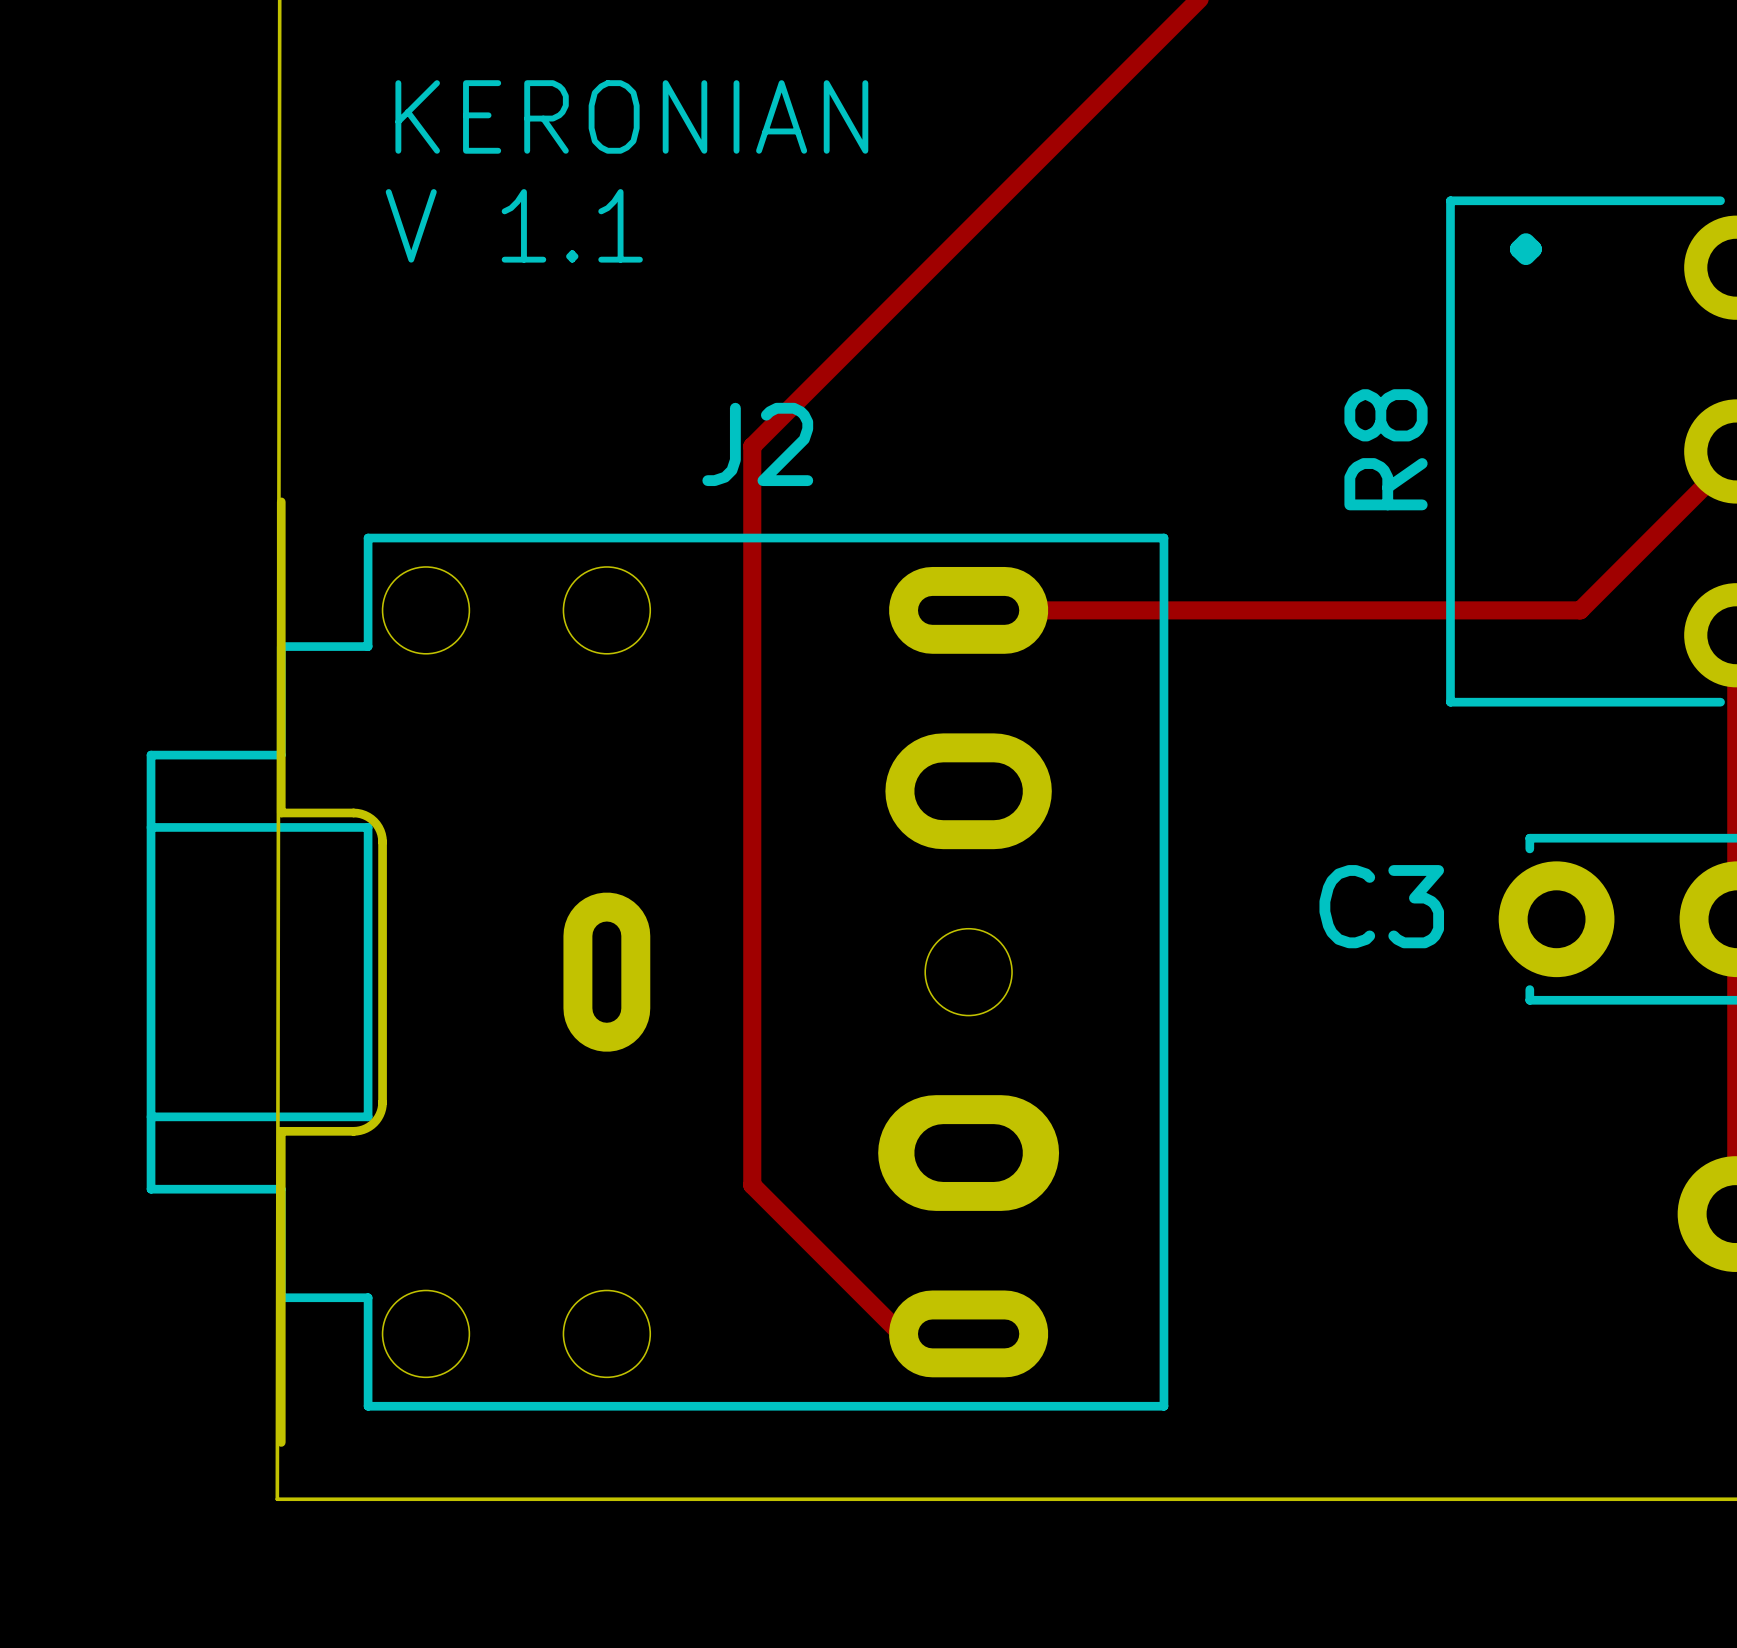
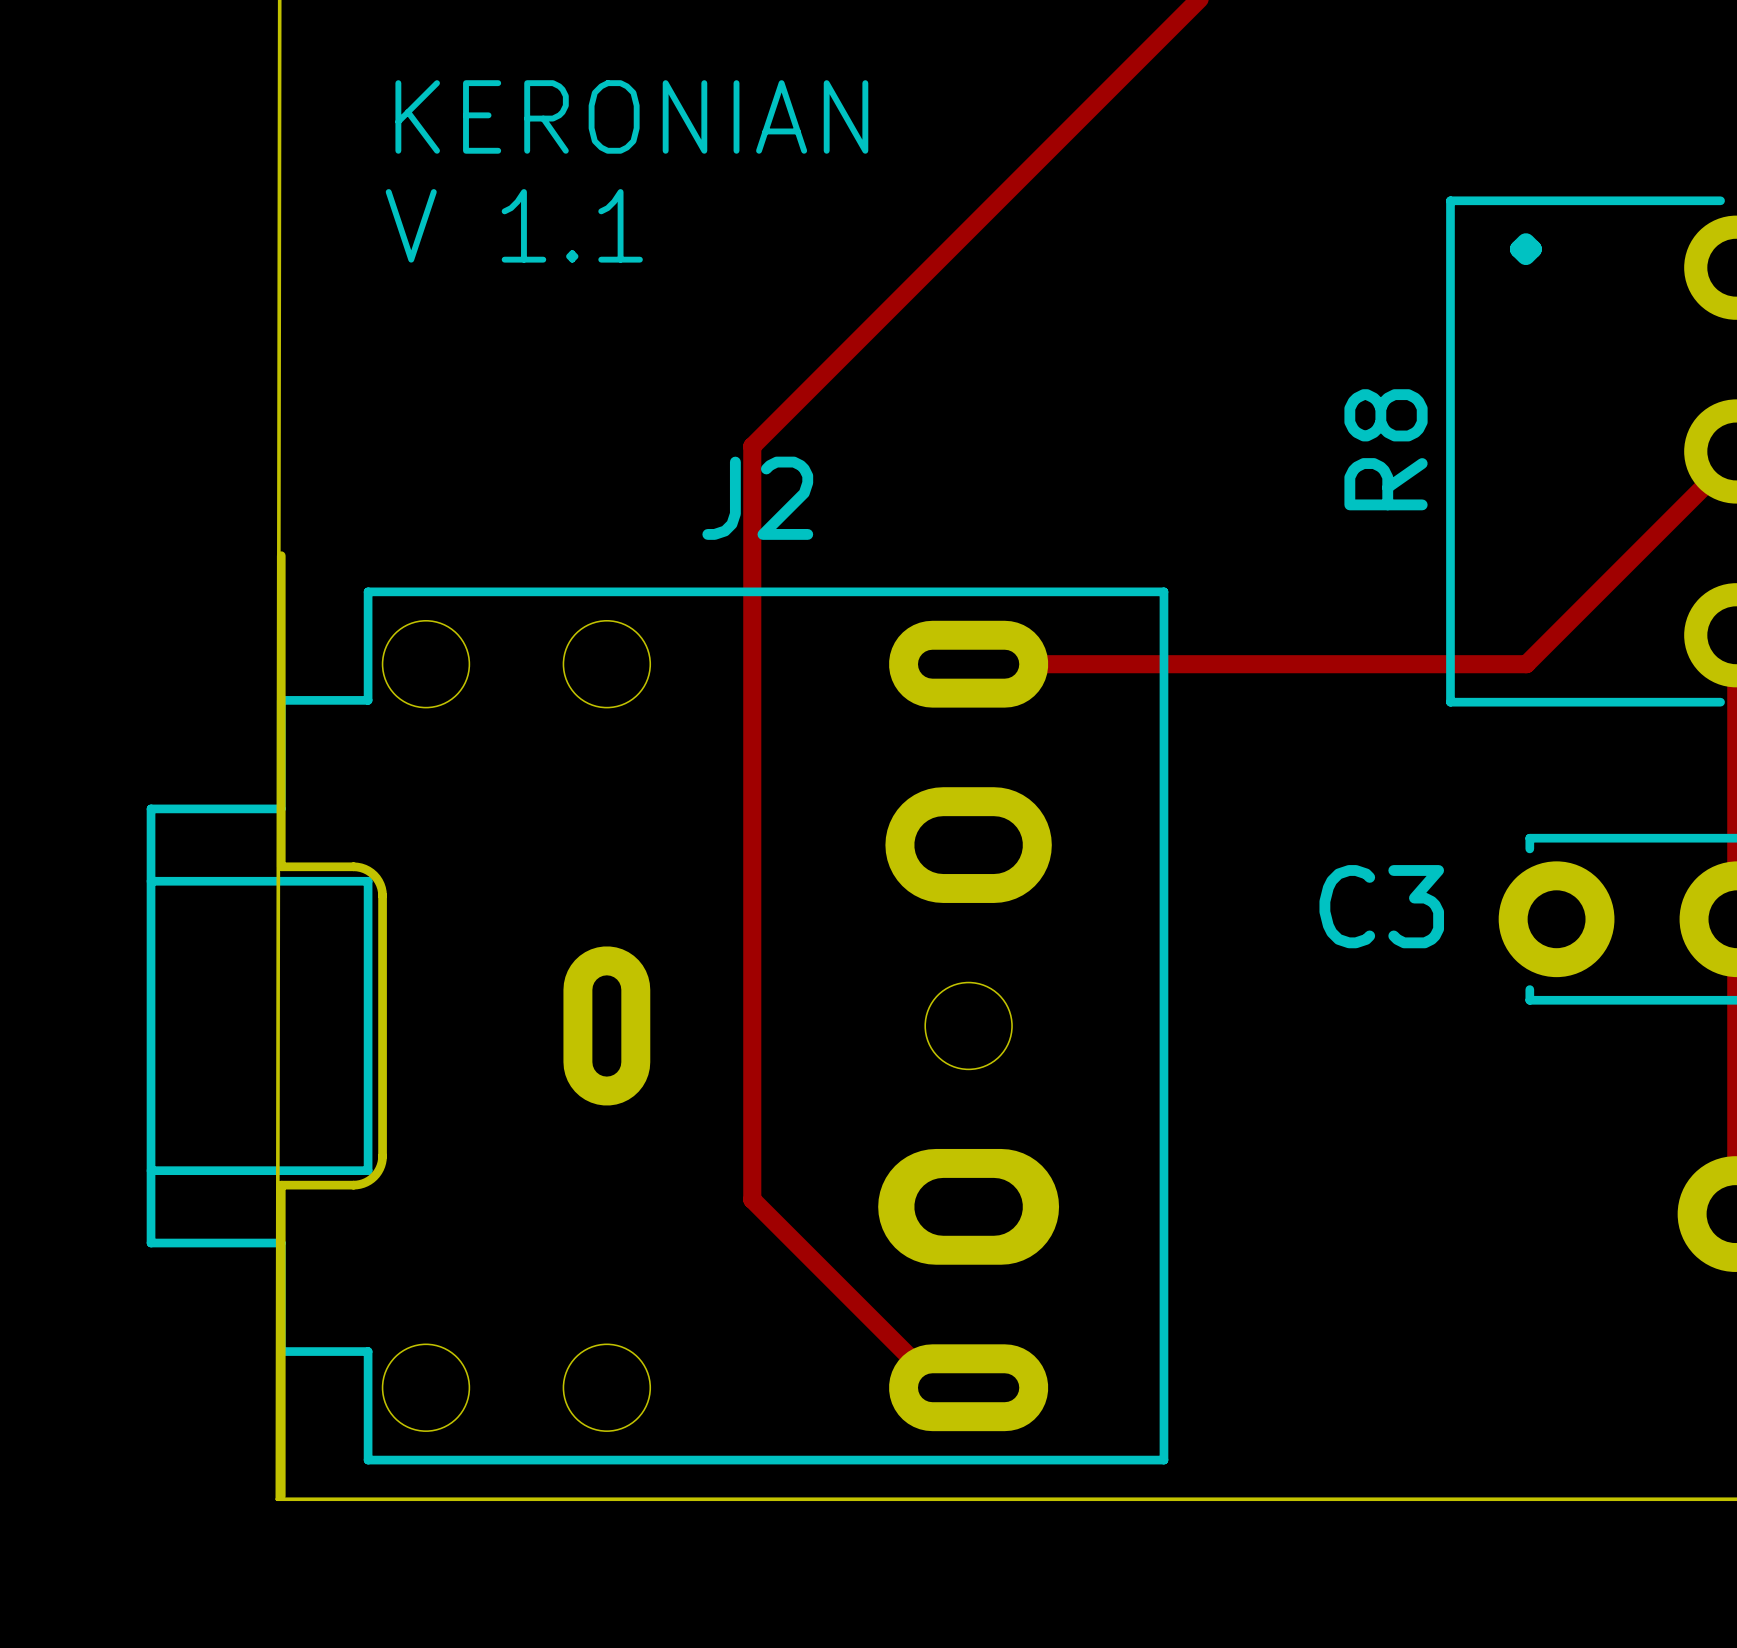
track: (968, 610) (1580, 610) -> (968, 664) (1526, 664) (1580, 610)
J2 position: (657, 972) -> (657, 1025)
track: (752, 1185) (901, 1333) (968, 1333) -> (752, 1185) (752, 1199) (940, 1387) (968, 1387)

